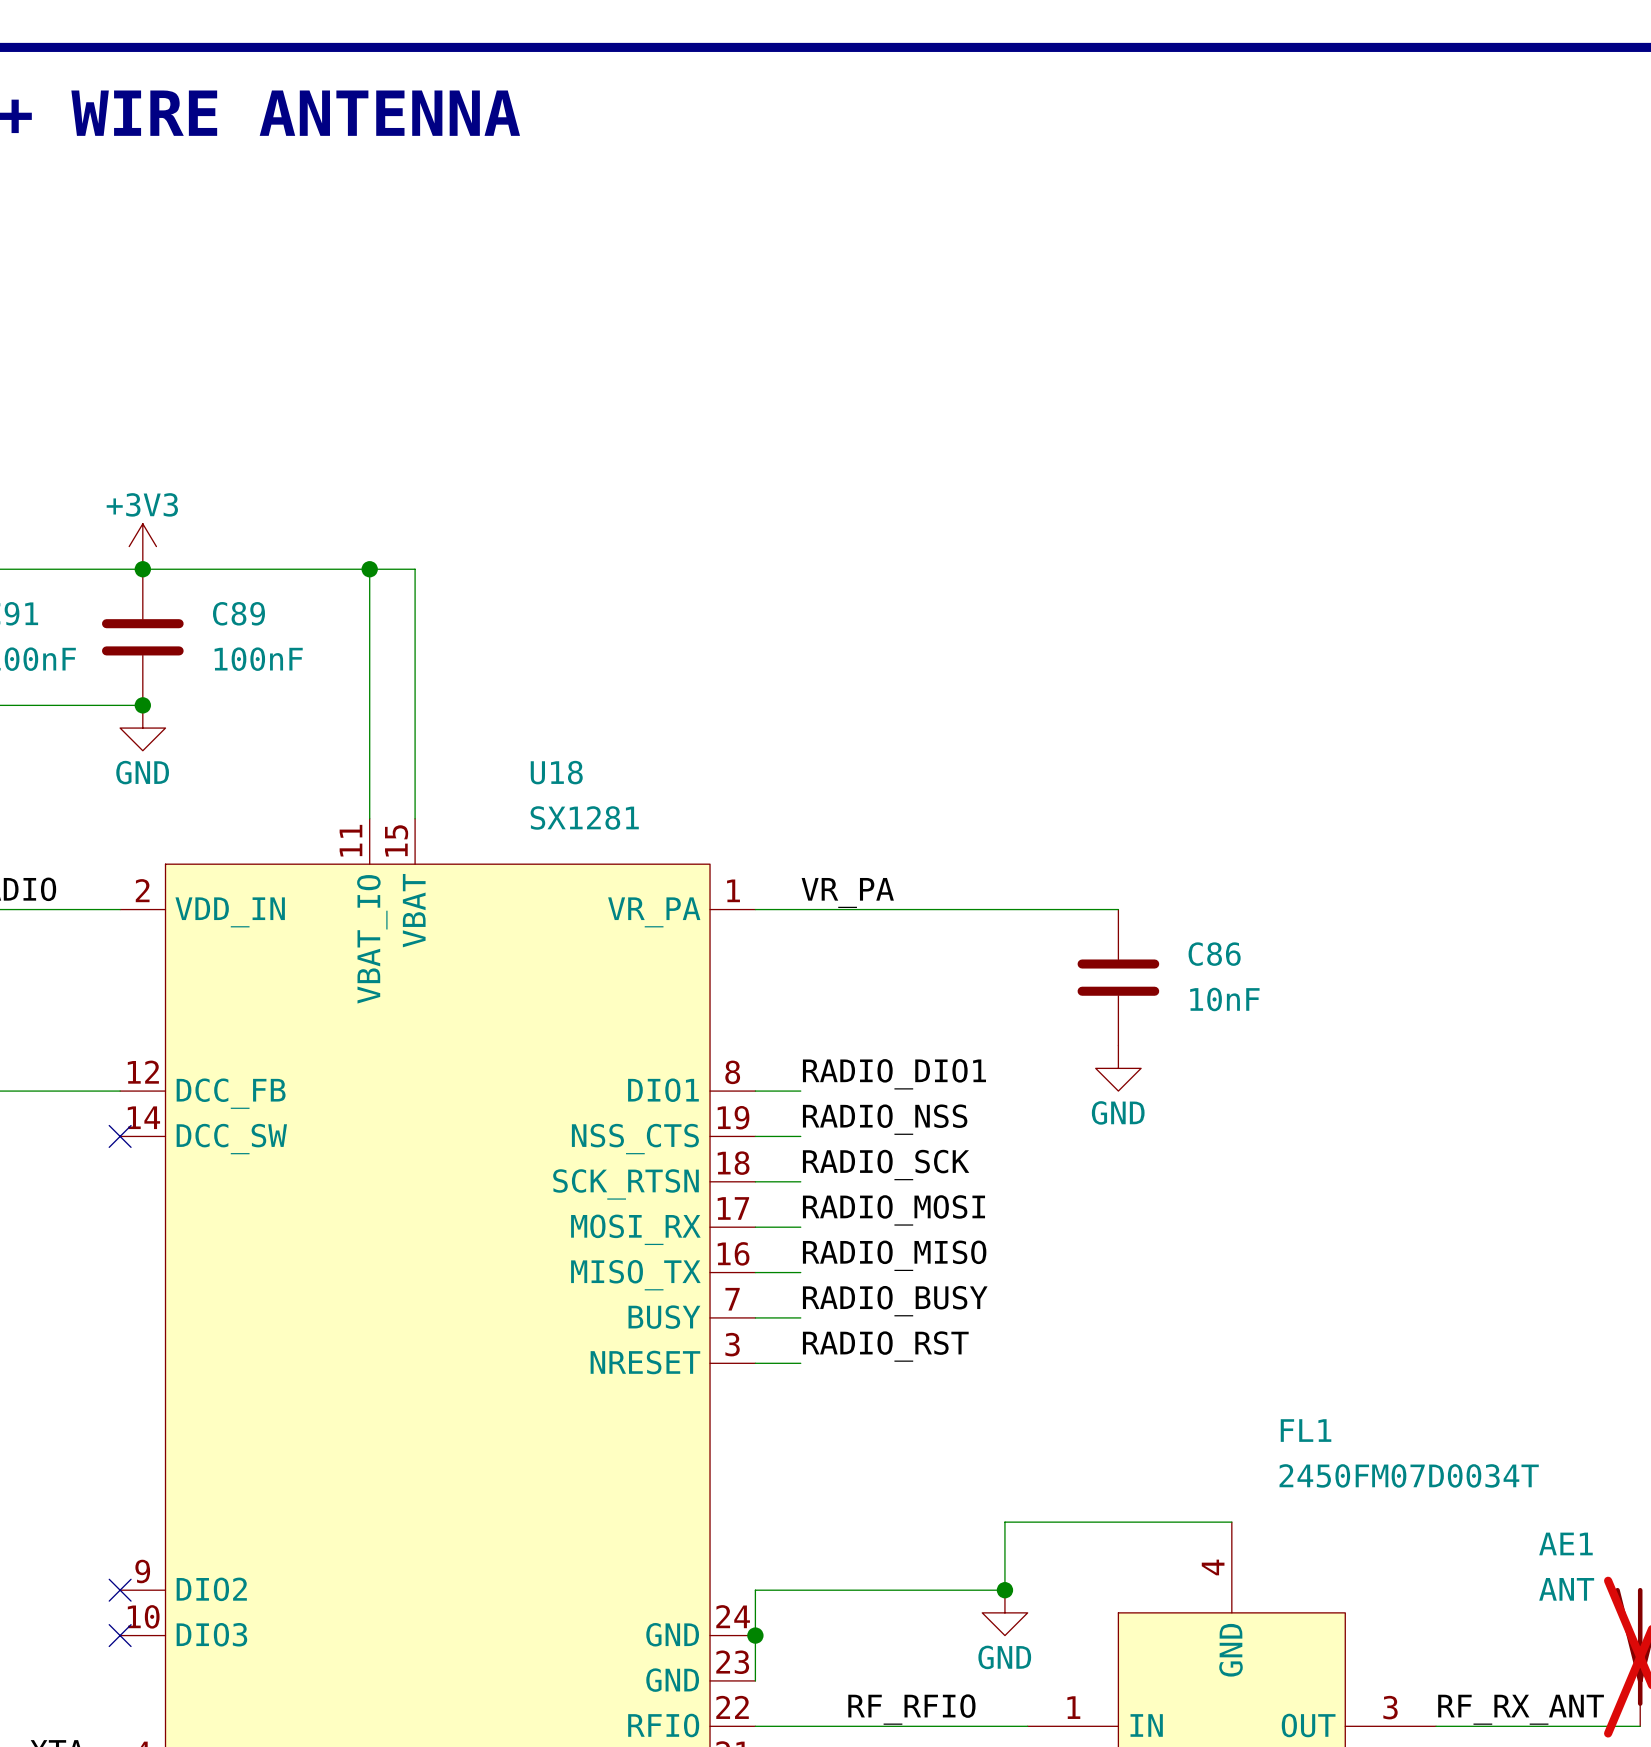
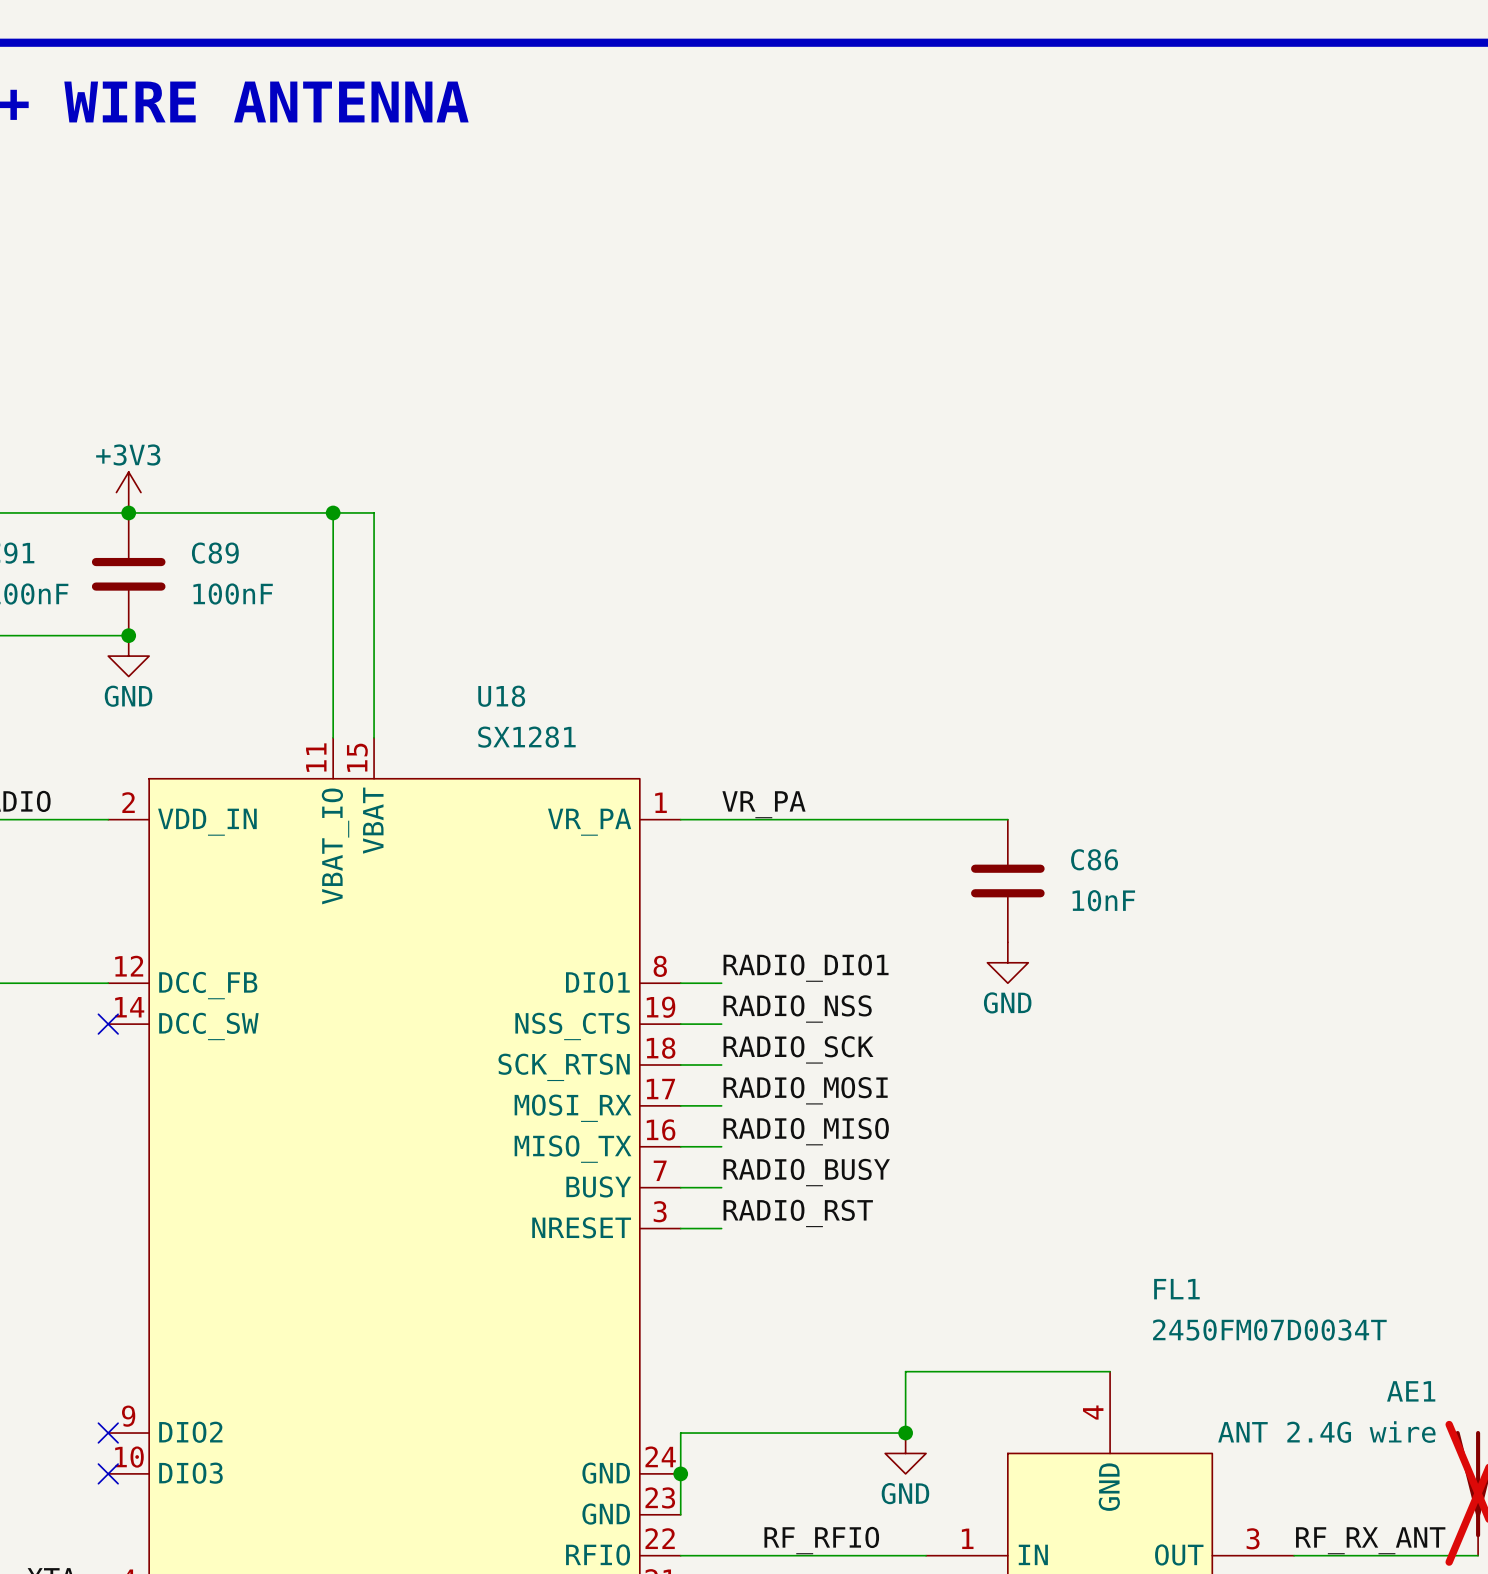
AE1 value: ANT (1566, 1589) -> ANT 2.4G wire (1326, 1432)

